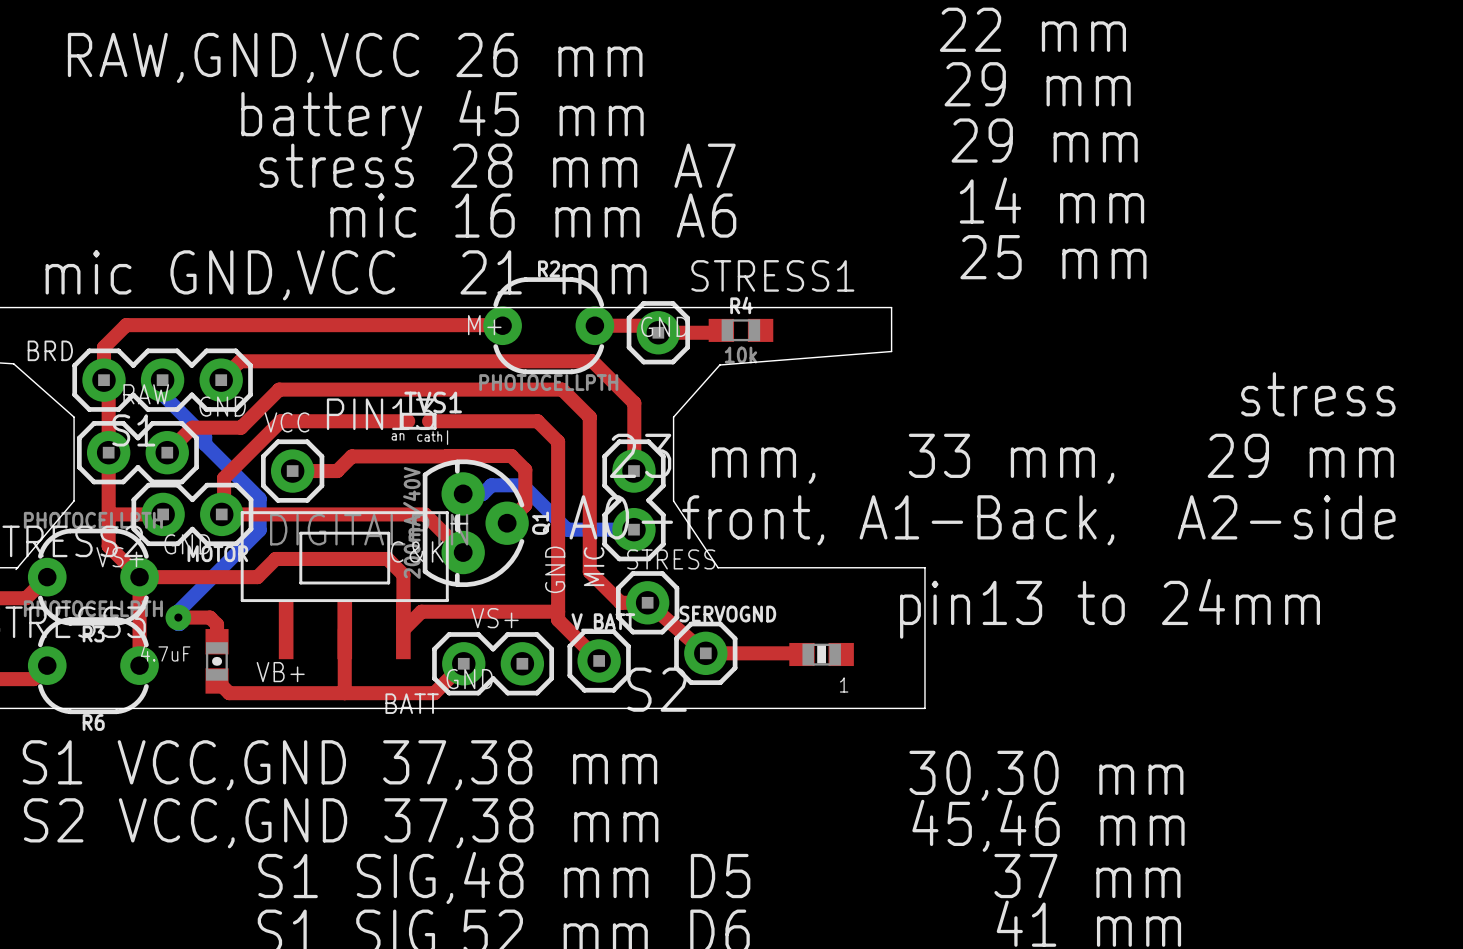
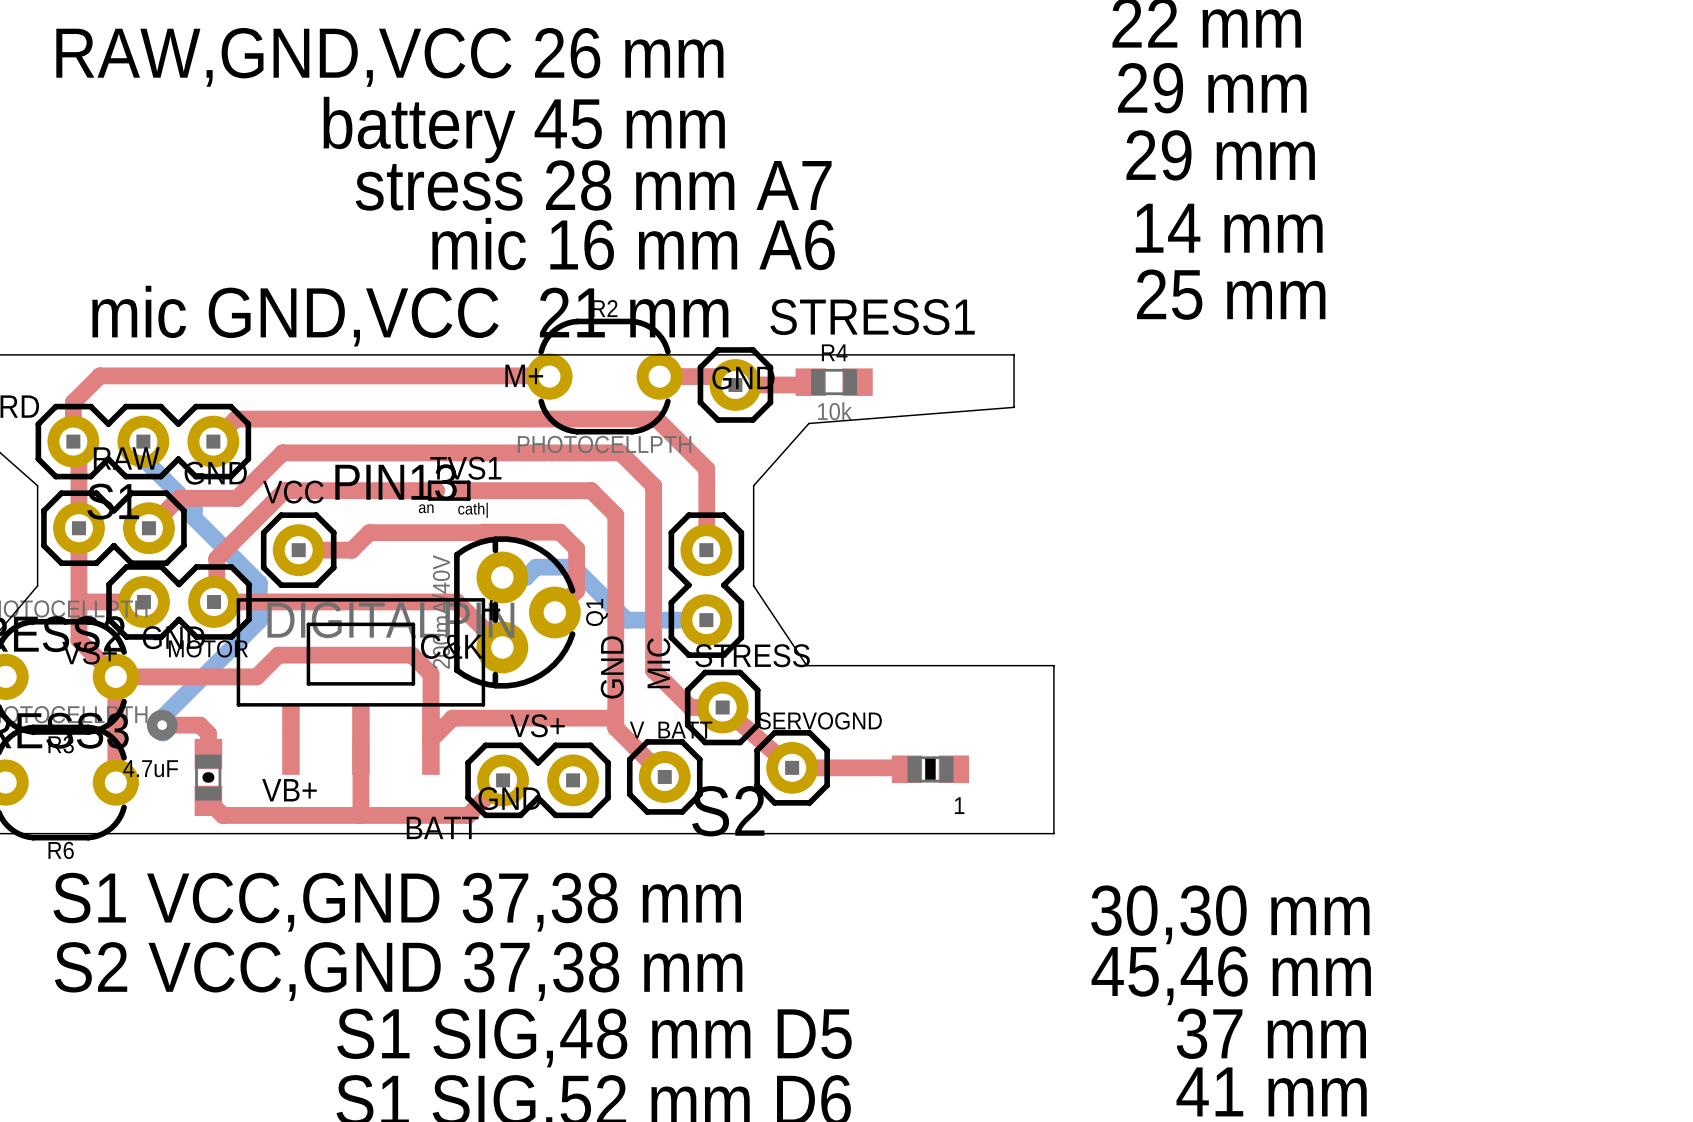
text: stress (1318, 394) -> none
text: 23 mm, 33 mm, 29 mm (1001, 458) -> none
text: A0-front, A1-Back, A2-side (982, 520) -> none
text: pin13 to 24mm (1110, 608) -> none

